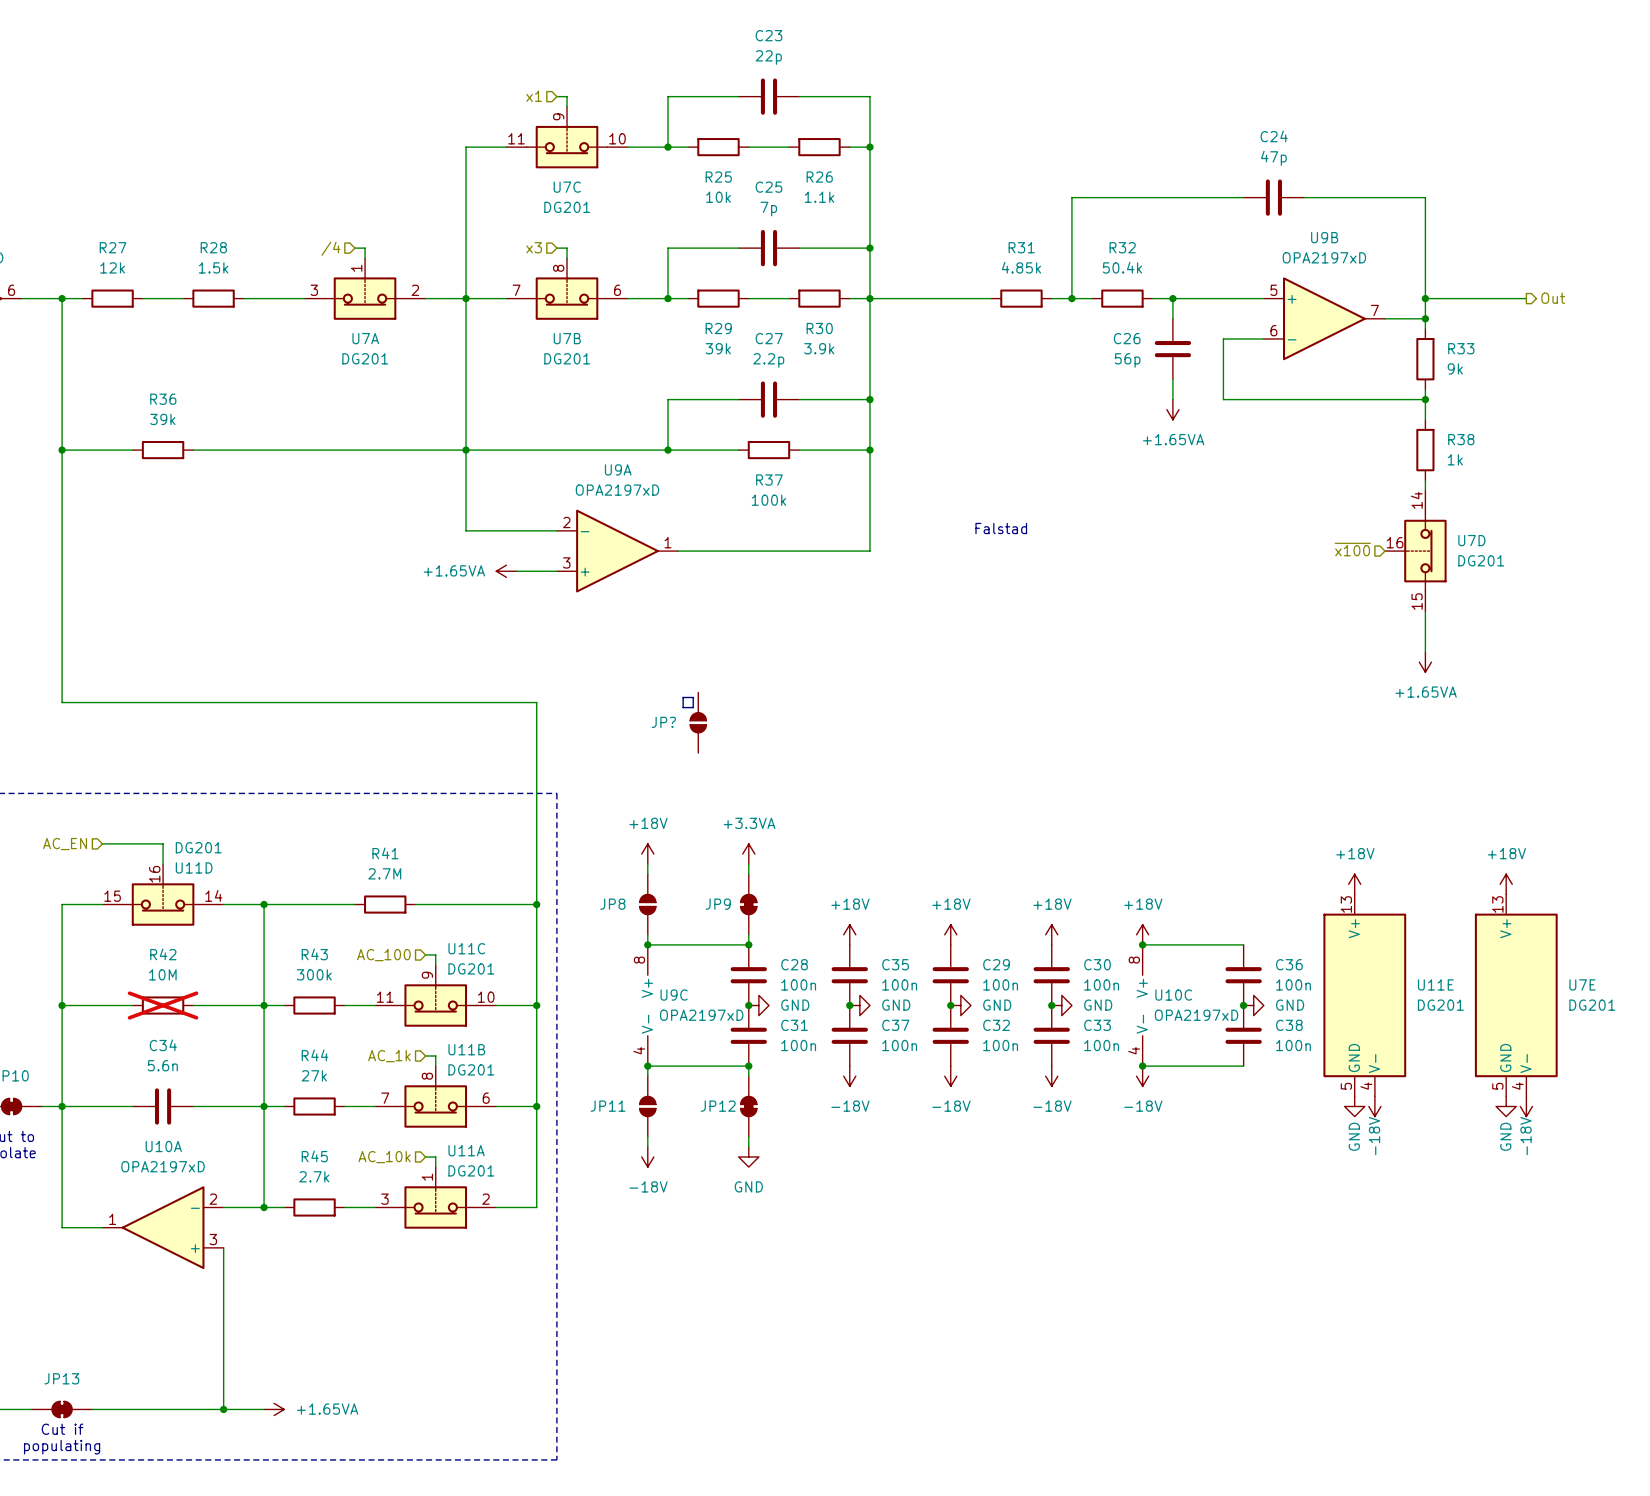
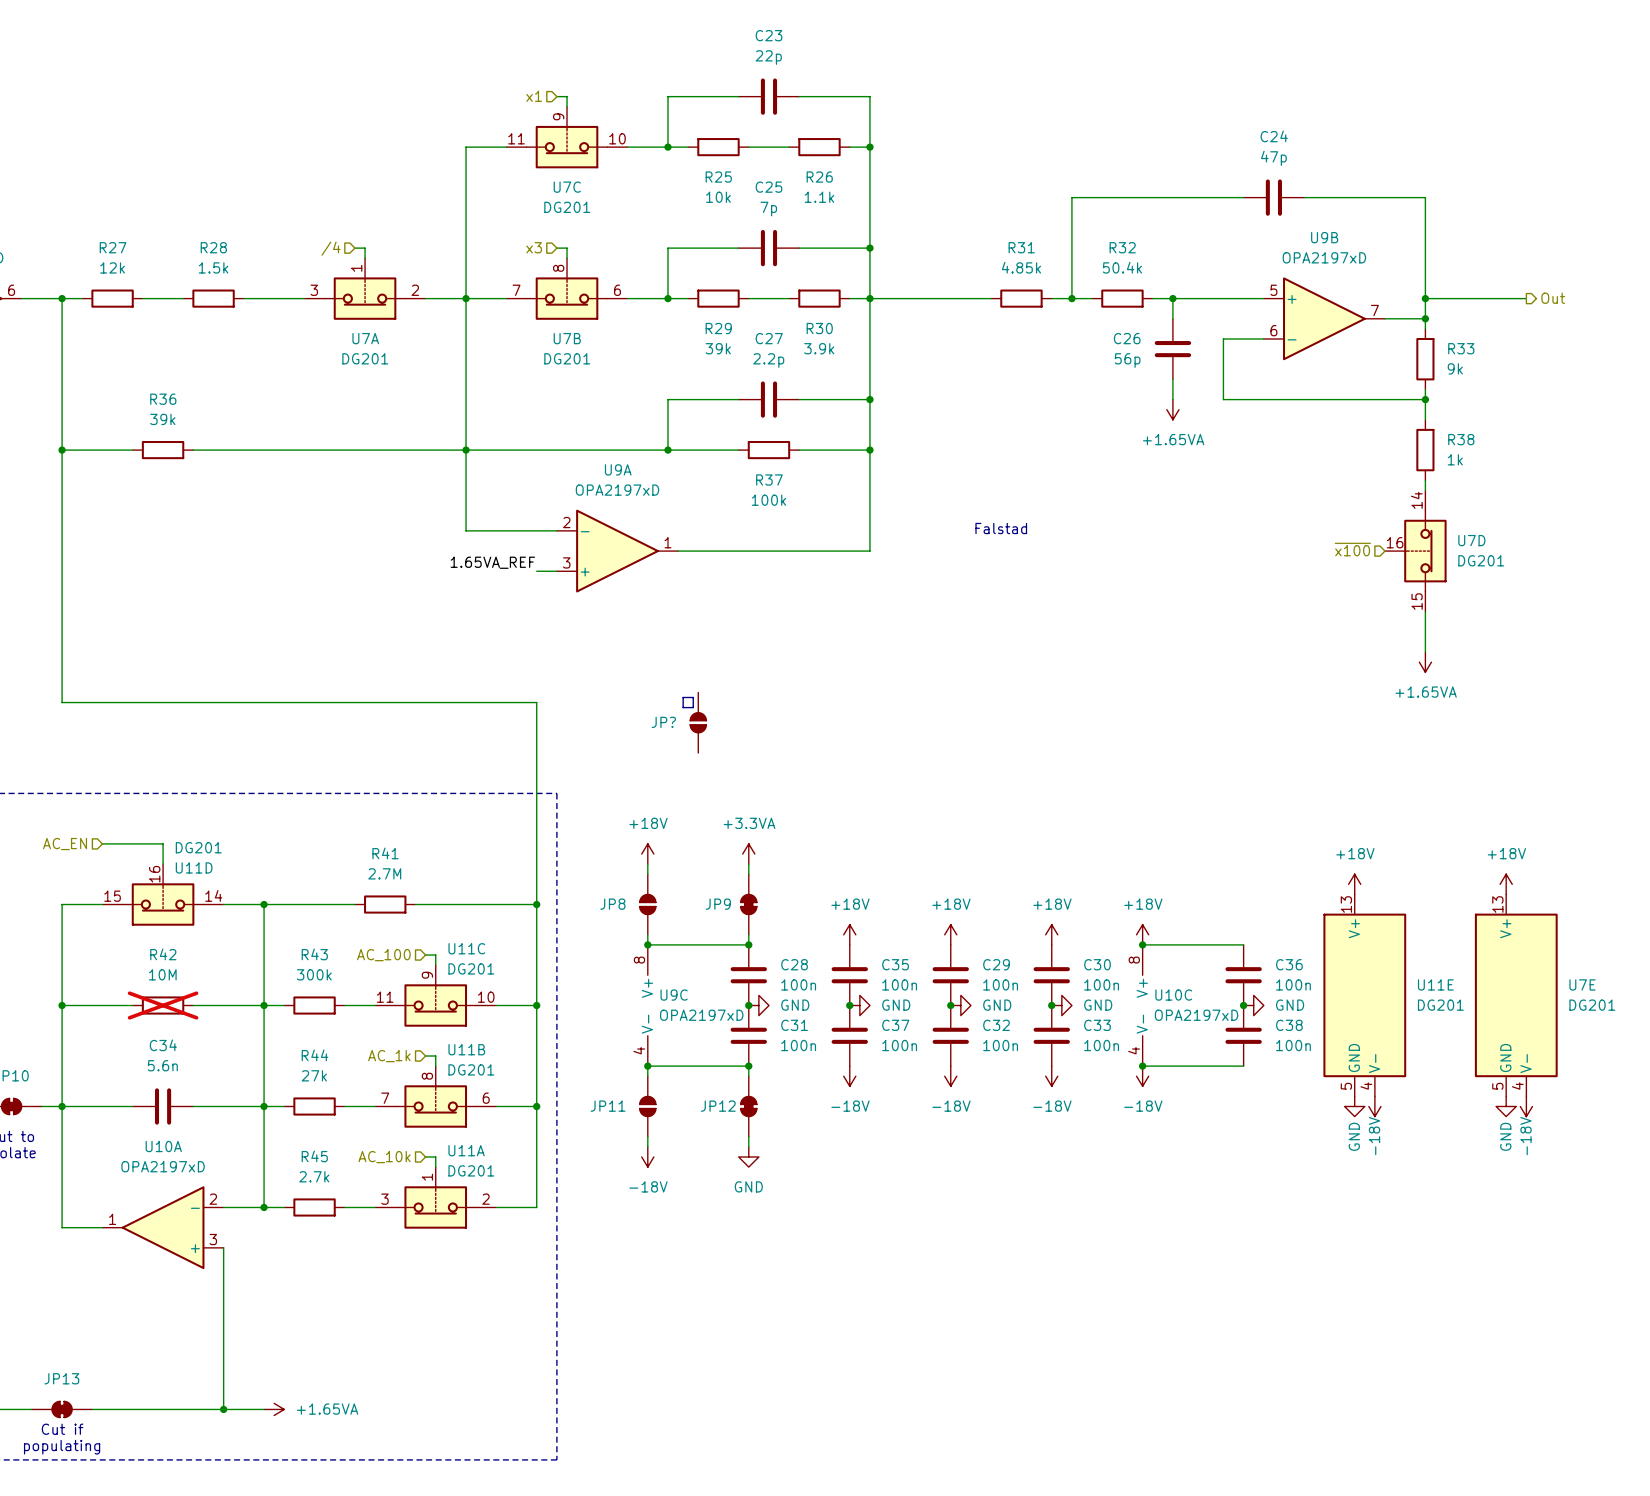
label: none -> 1.65VA_REF (492, 562)
power symbol: +1.65VA (506, 571) -> none
wire: (516, 571) (536, 571) -> none

